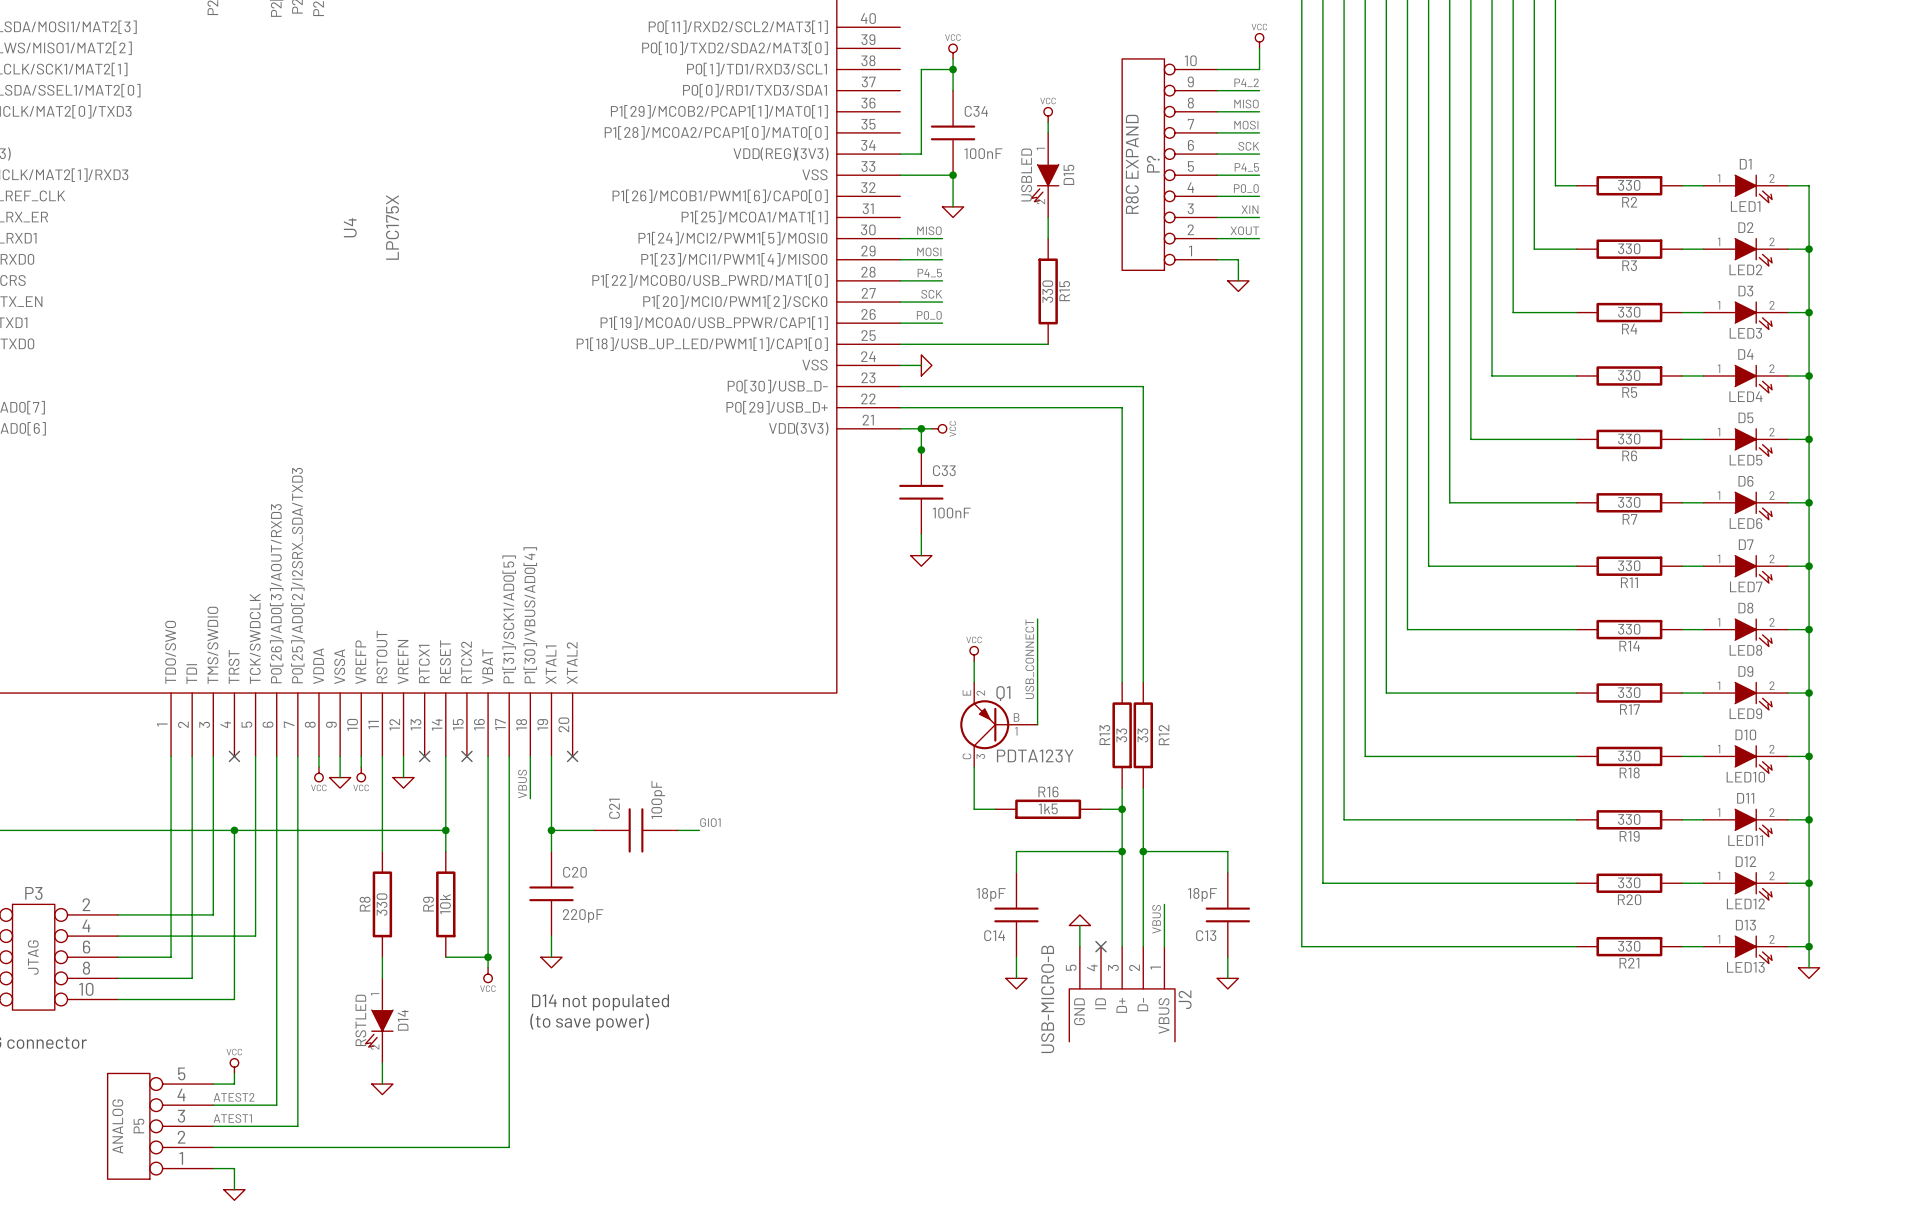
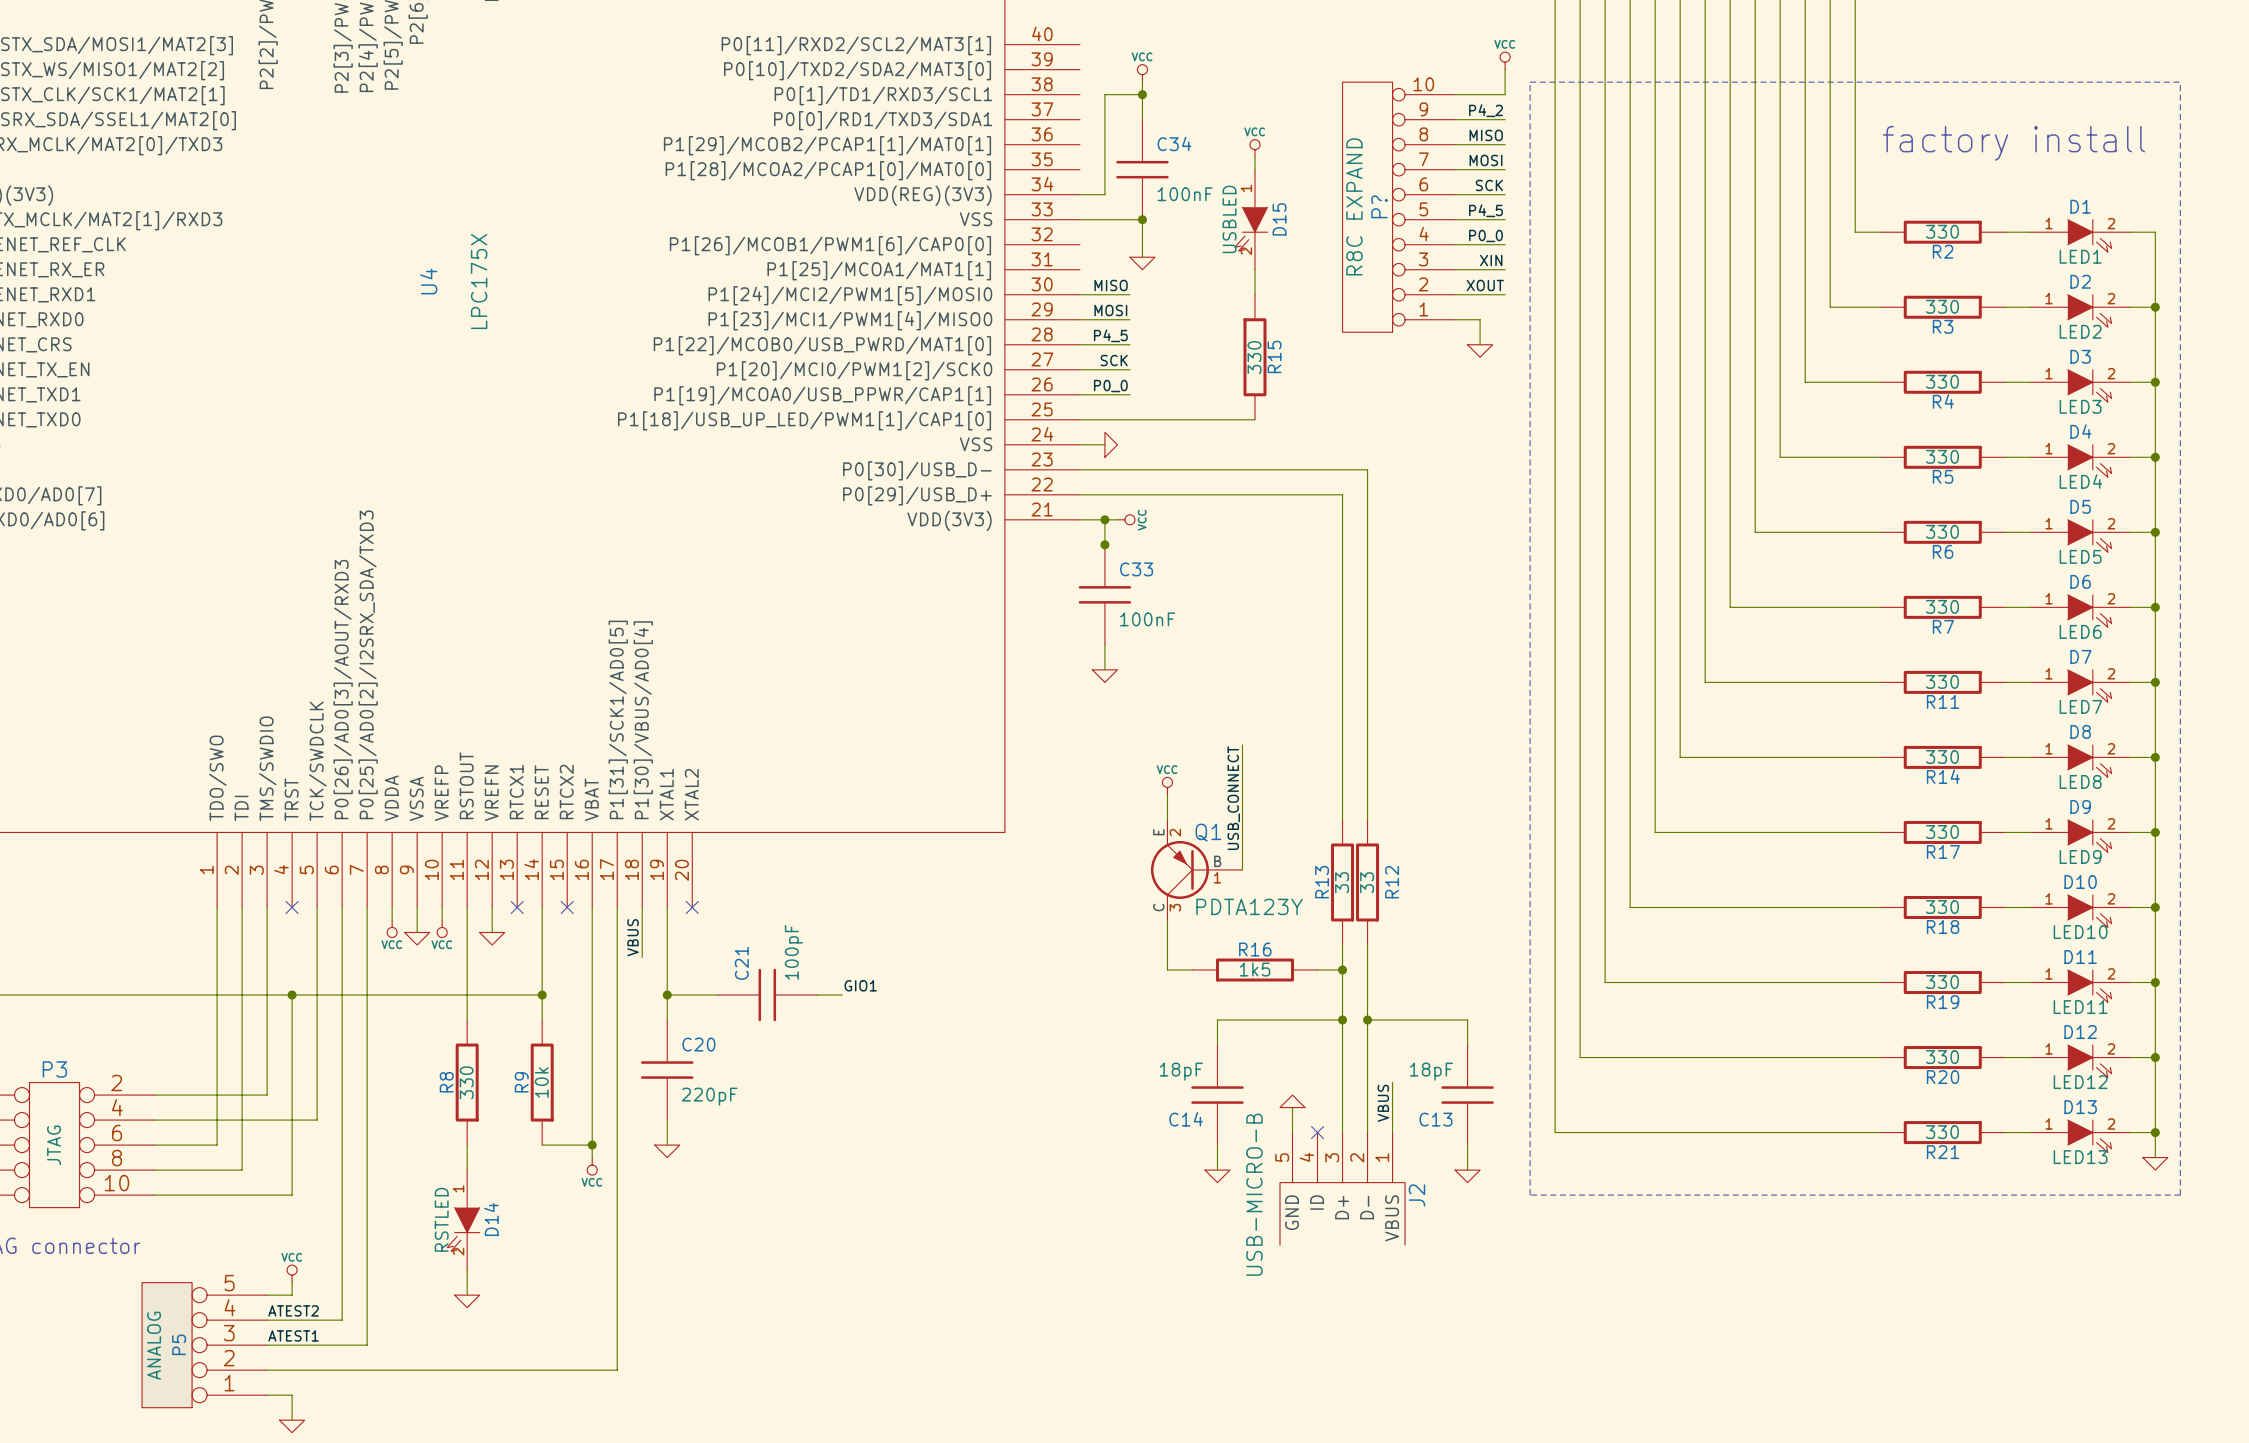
line: none -> (1530, 82) (1530, 1195) (2180, 1195) (2180, 82) (1530, 82)
text: none -> factory install (2014, 143)
text: D14 not populated (600, 1002) -> none
text: (to save power) (589, 1022) -> none

